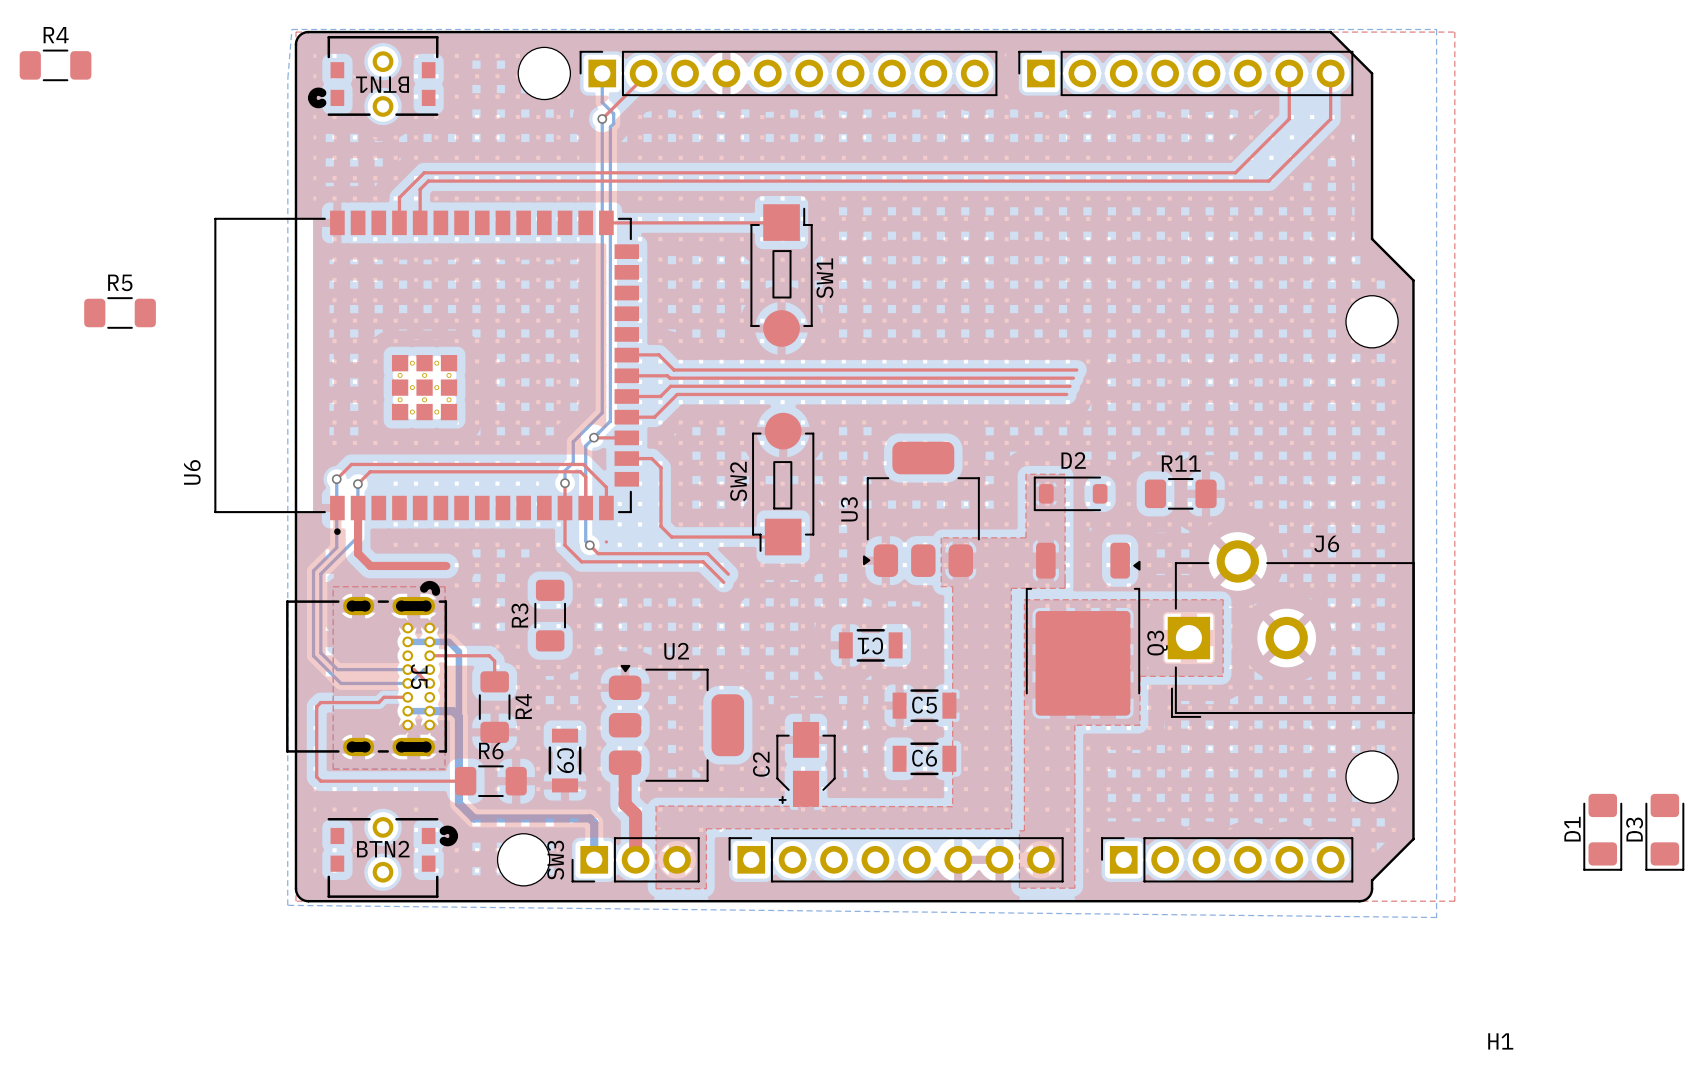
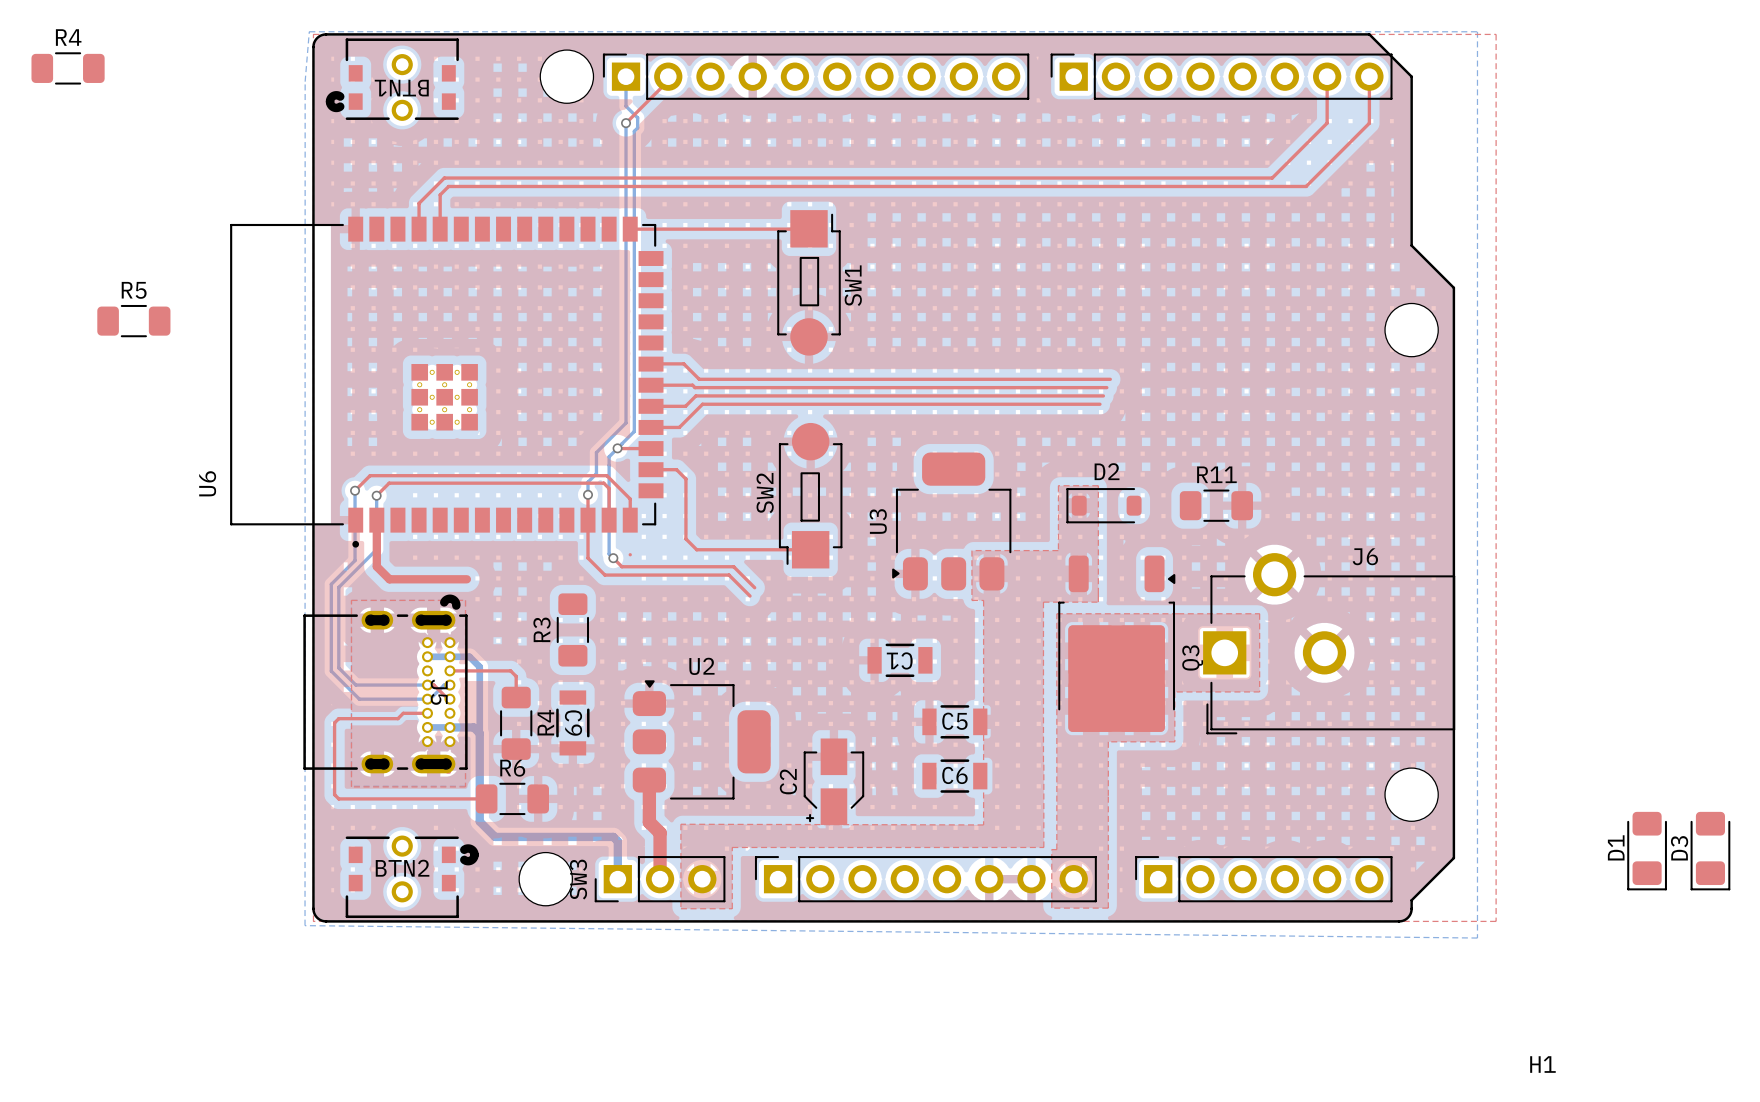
C9 position: (565, 760) -> (572, 722)

